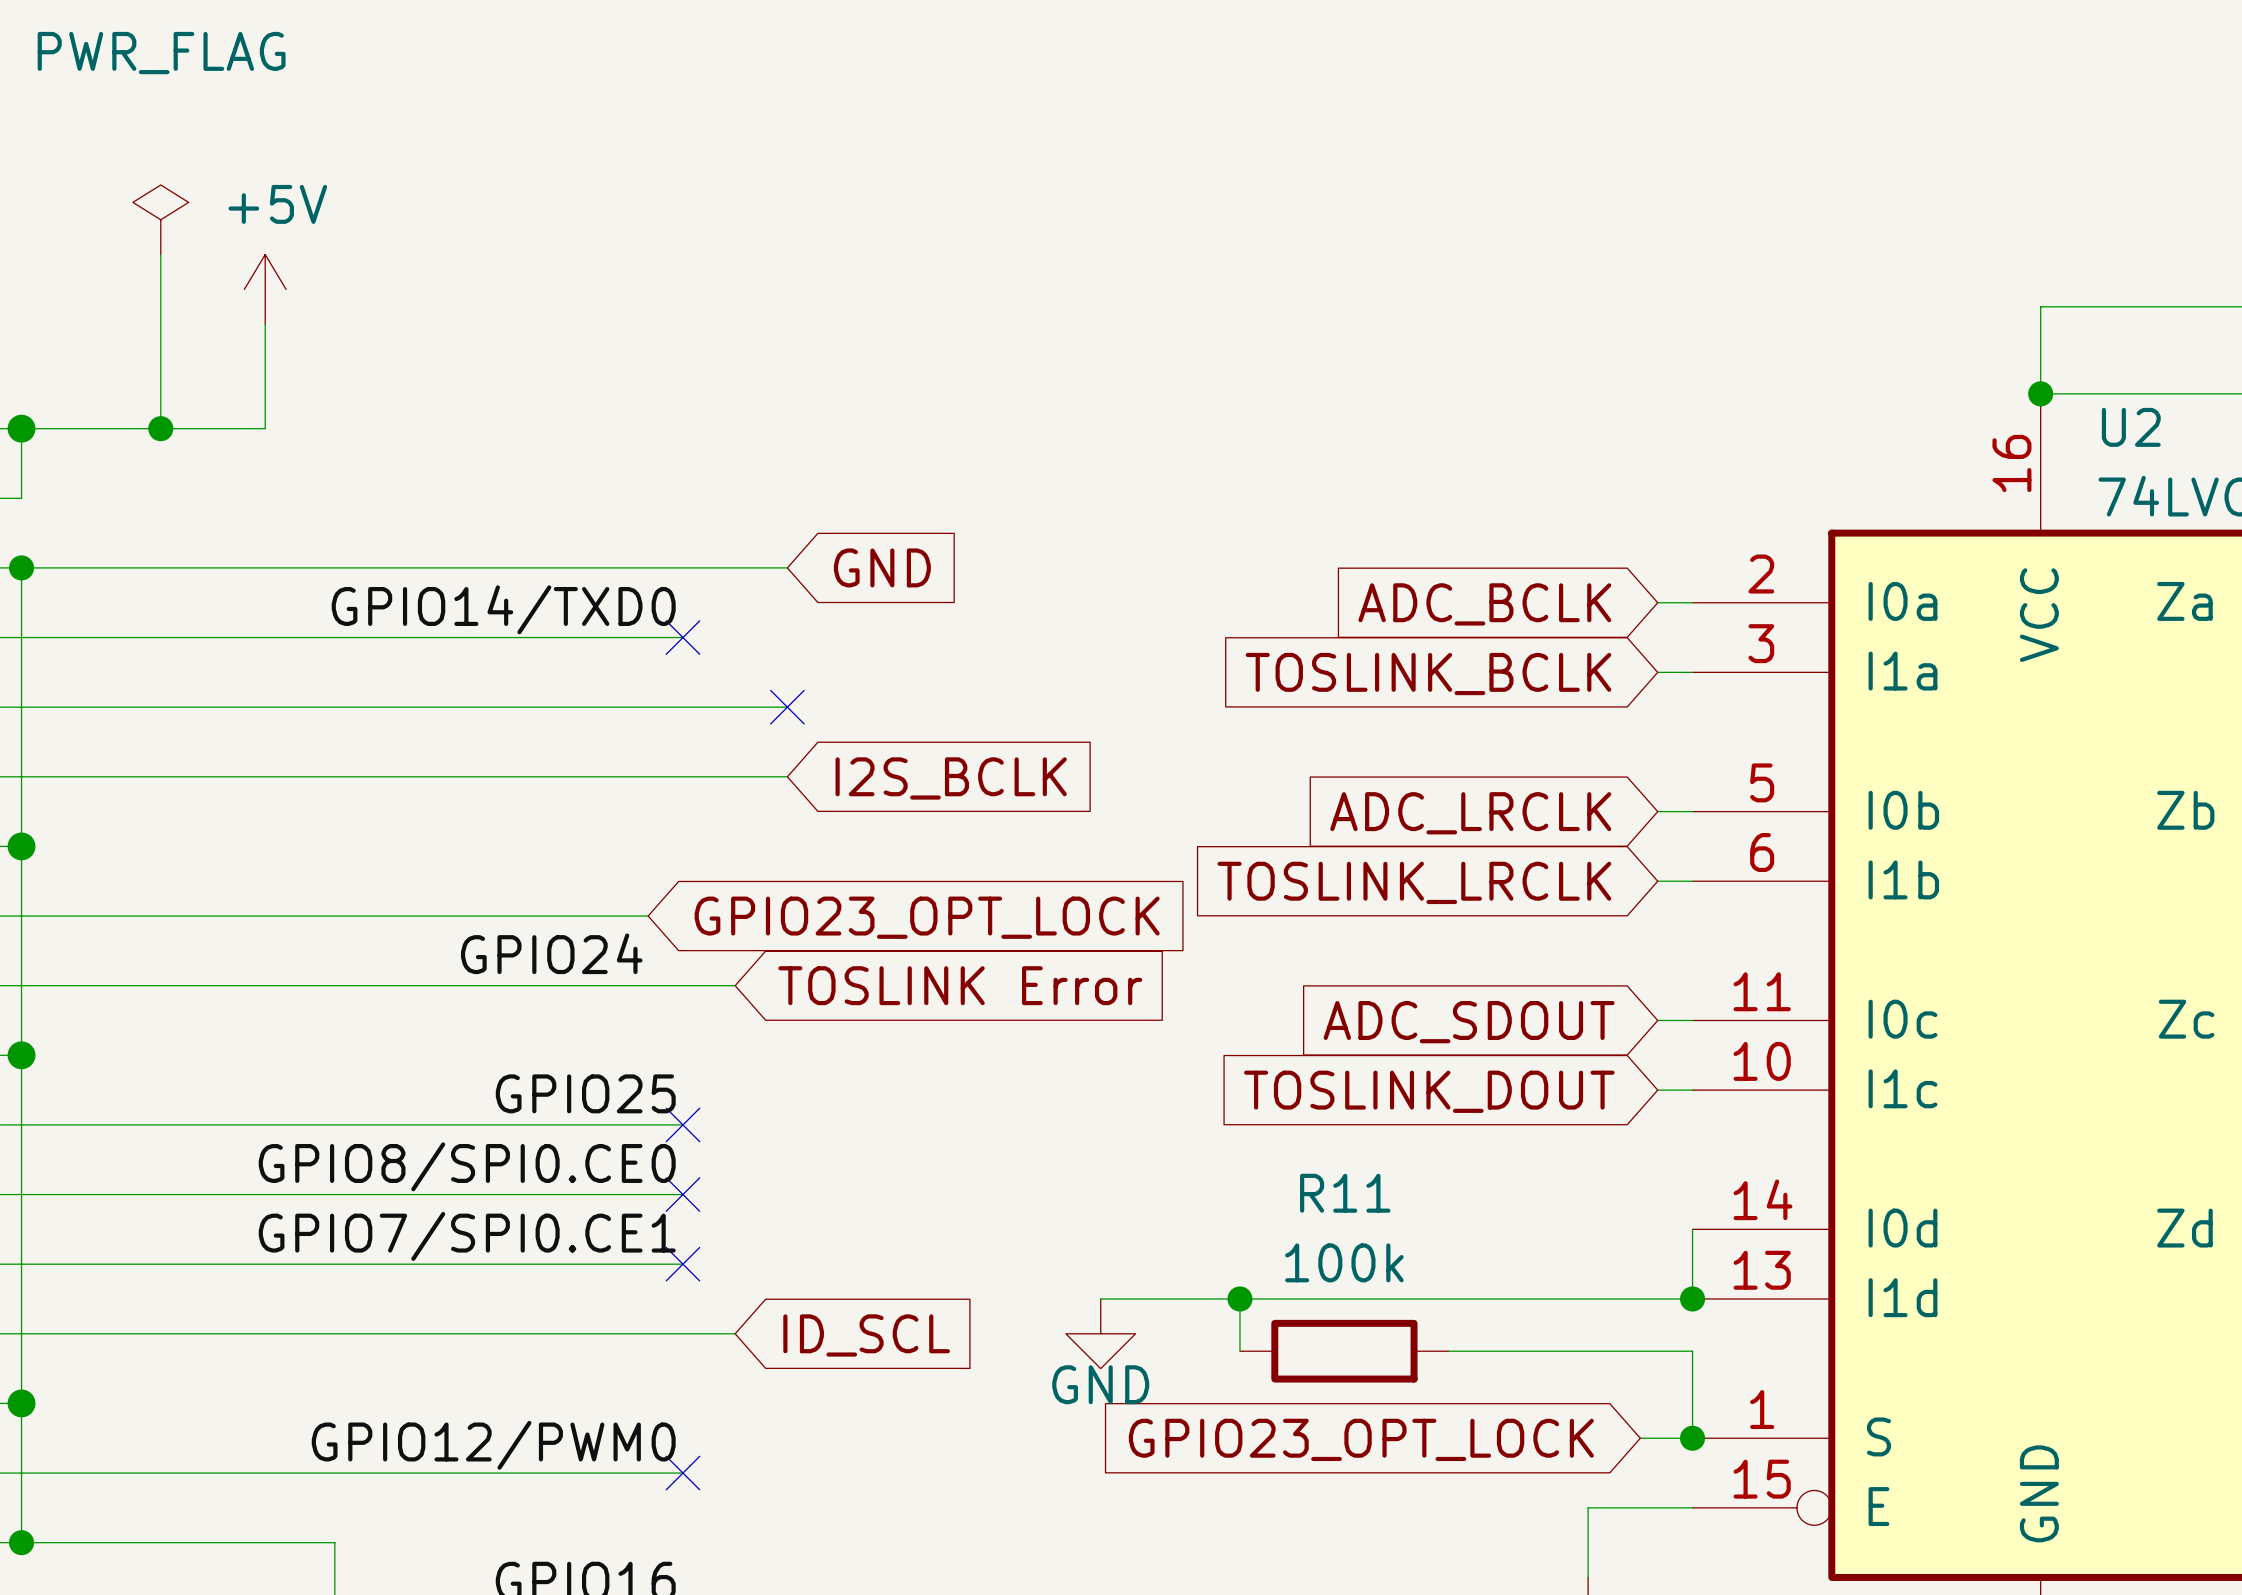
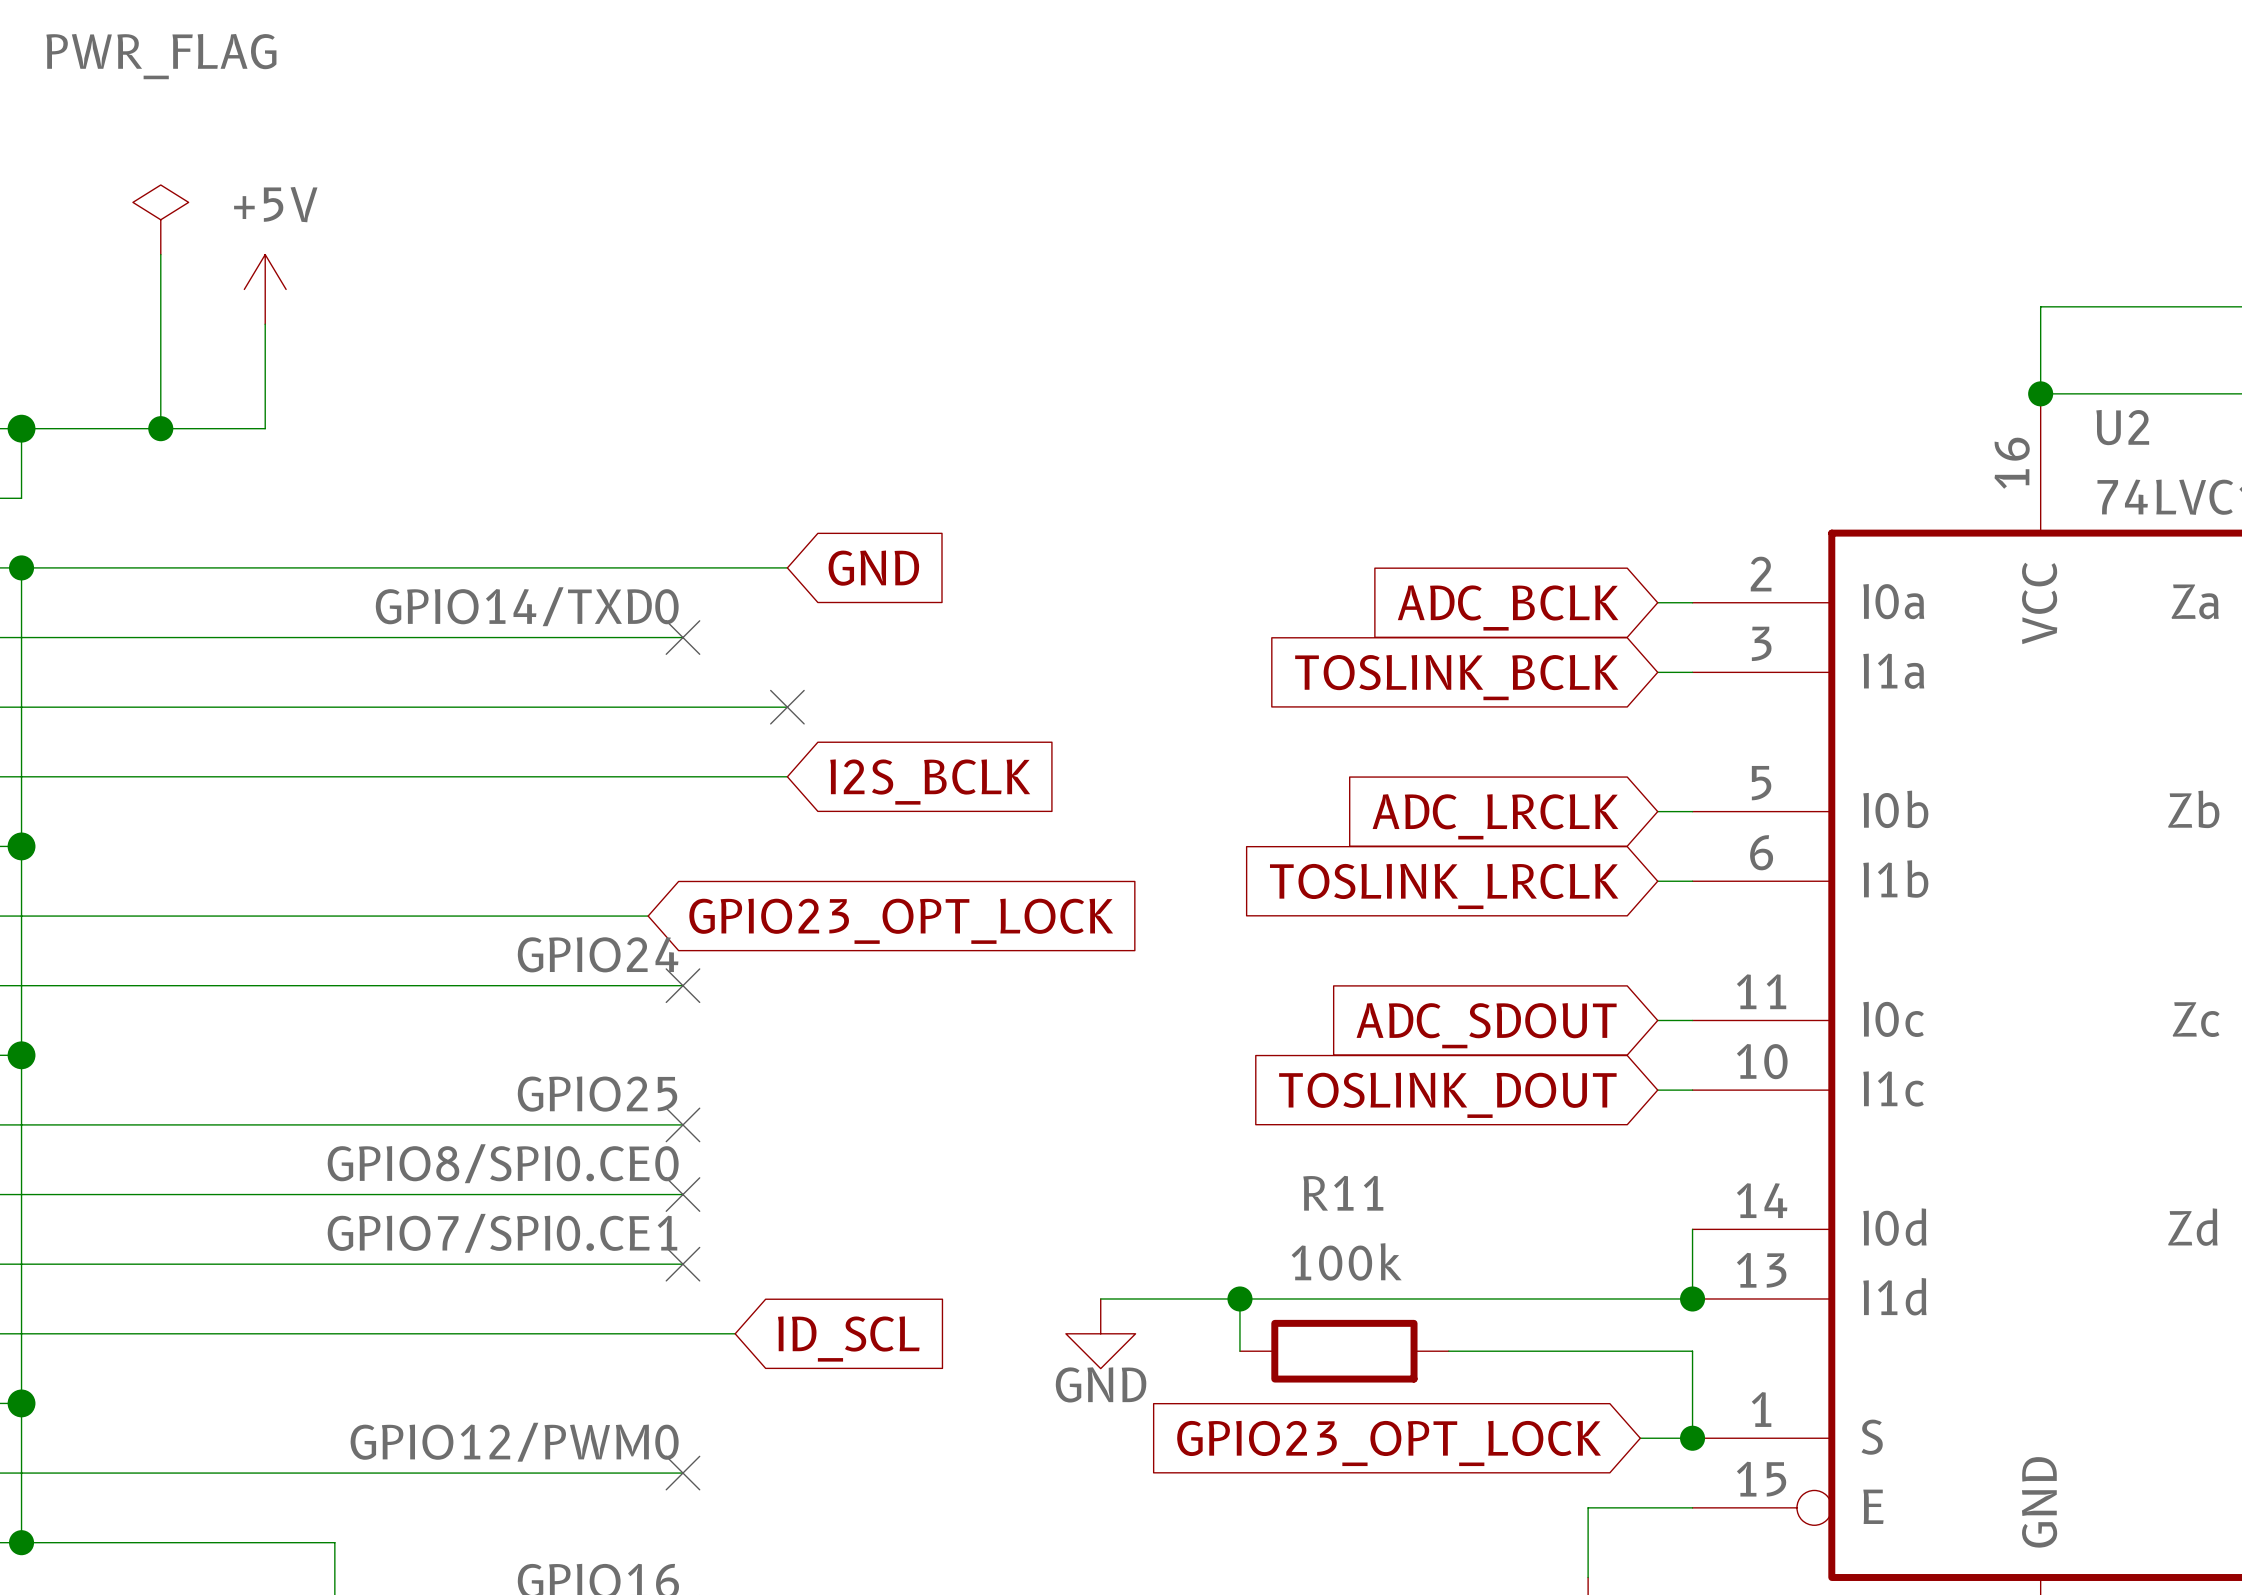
label position: GPIO24 (551, 953) -> GPIO24 (598, 954)
wire: (682, 985) (735, 985) -> none
no-connect mark: none -> (682, 985)
global label: TOSLINK Error (960, 985) -> none

